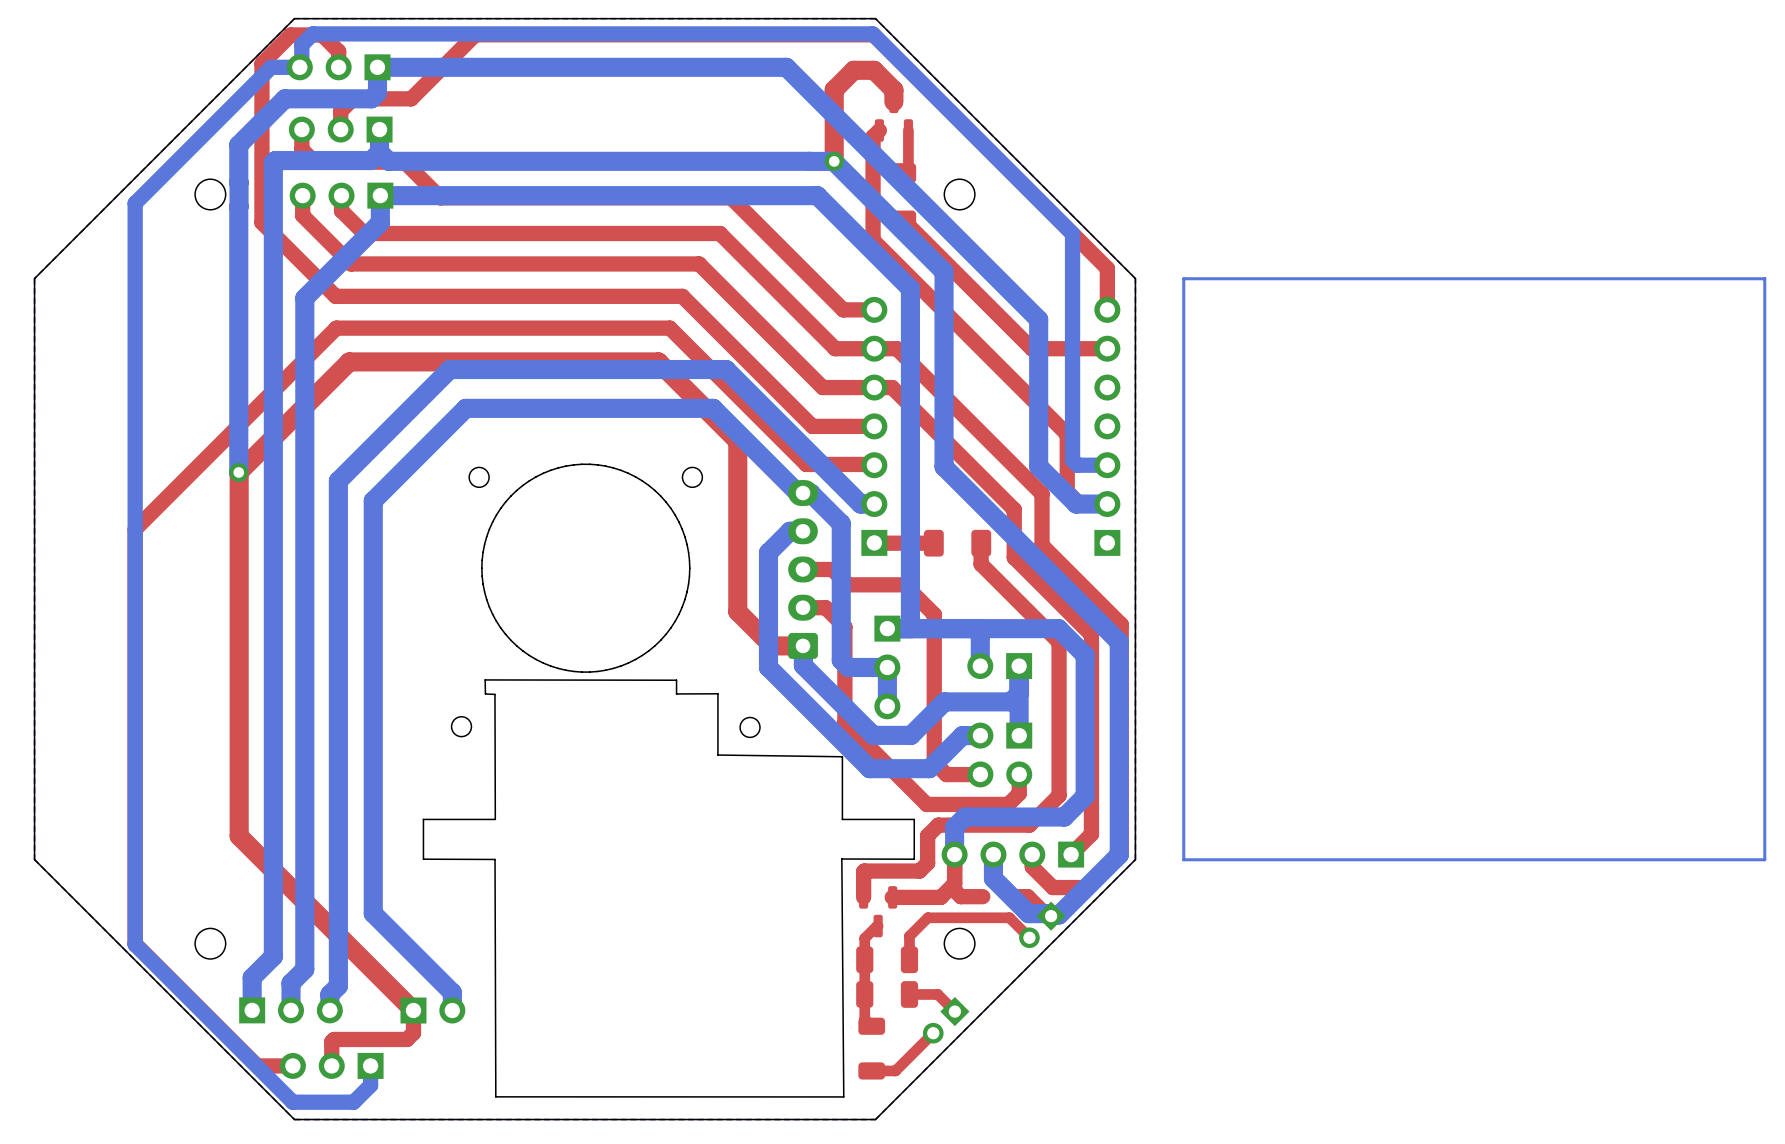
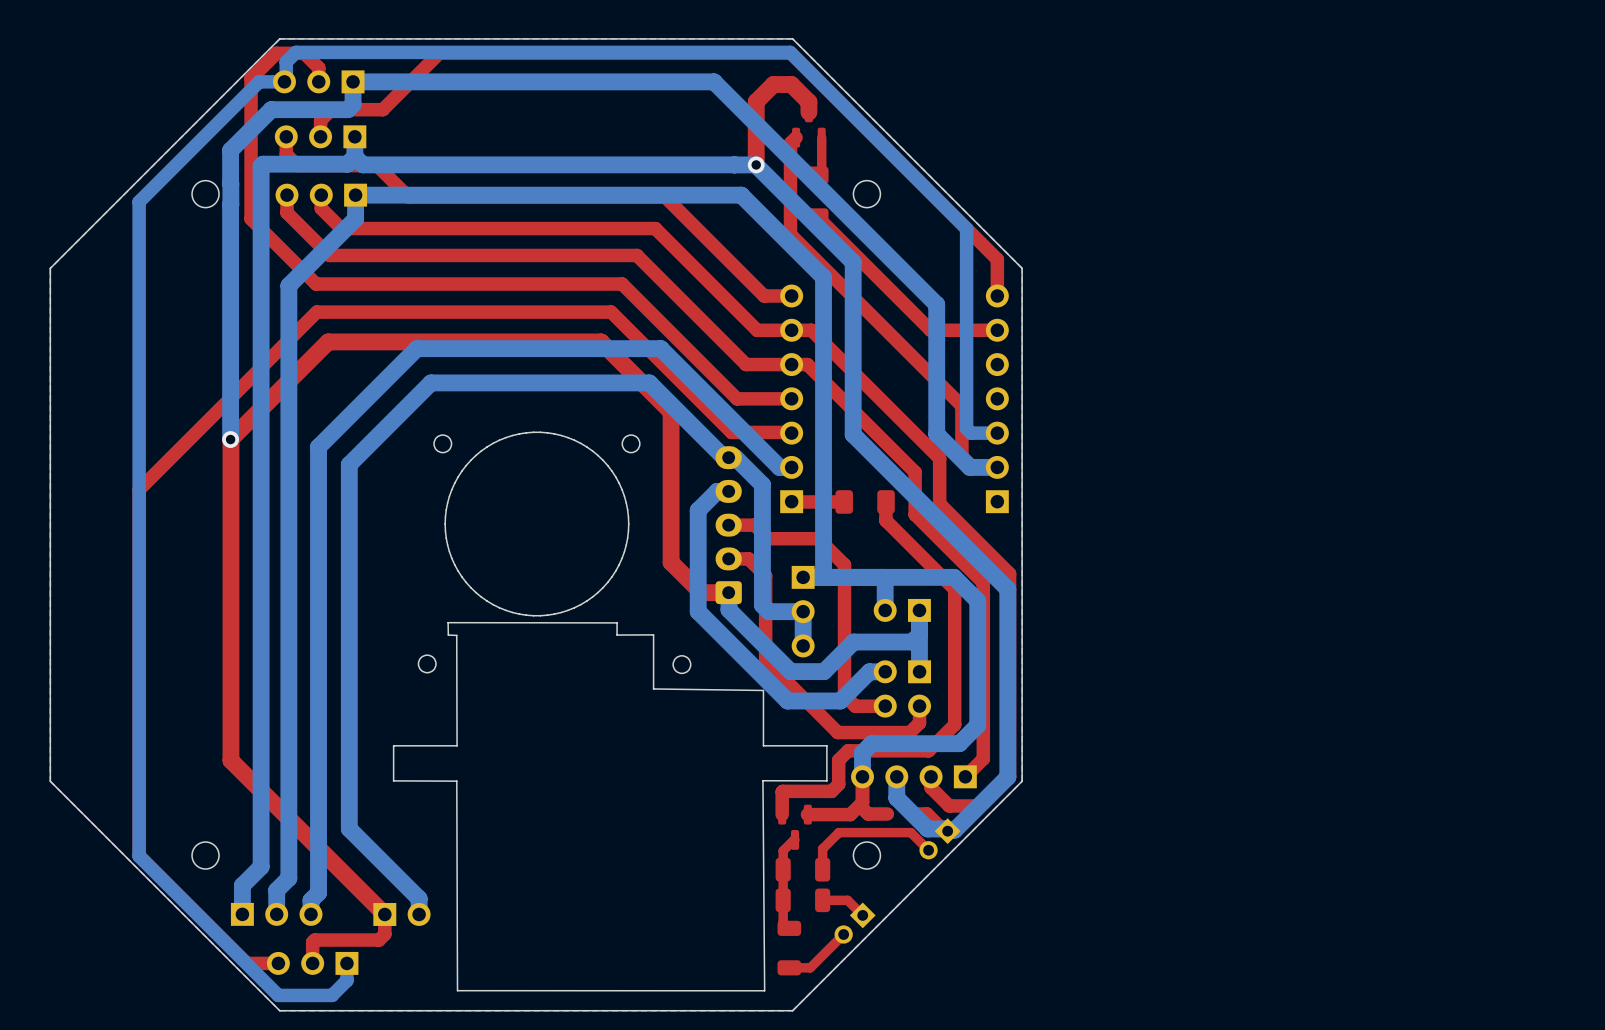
bottom track: (1764, 278) (1183, 278) (1183, 859) (1764, 859) (1764, 278) -> none

